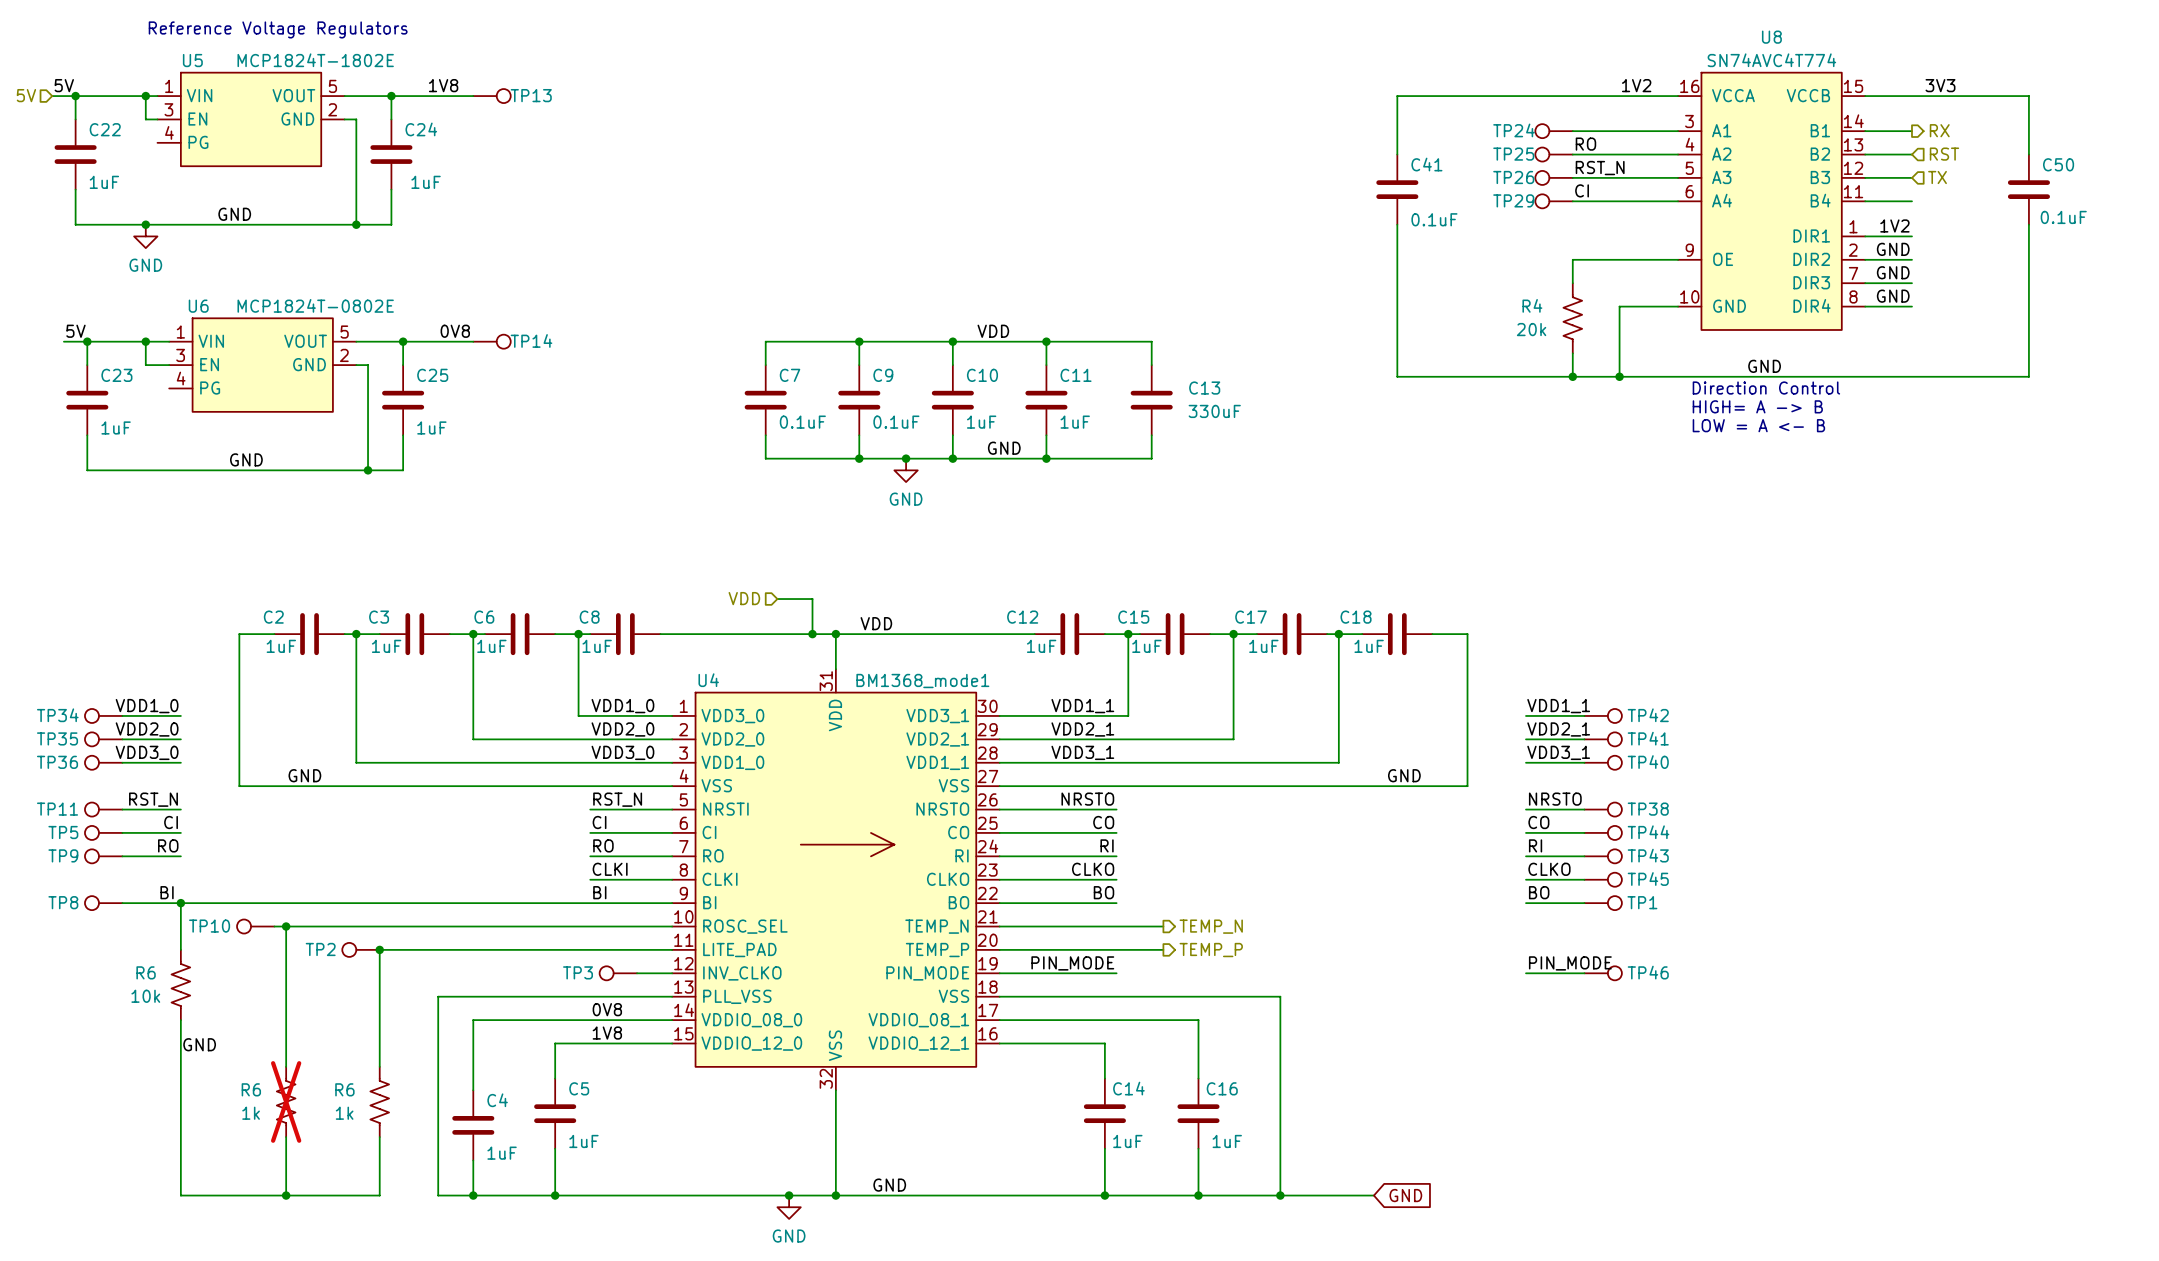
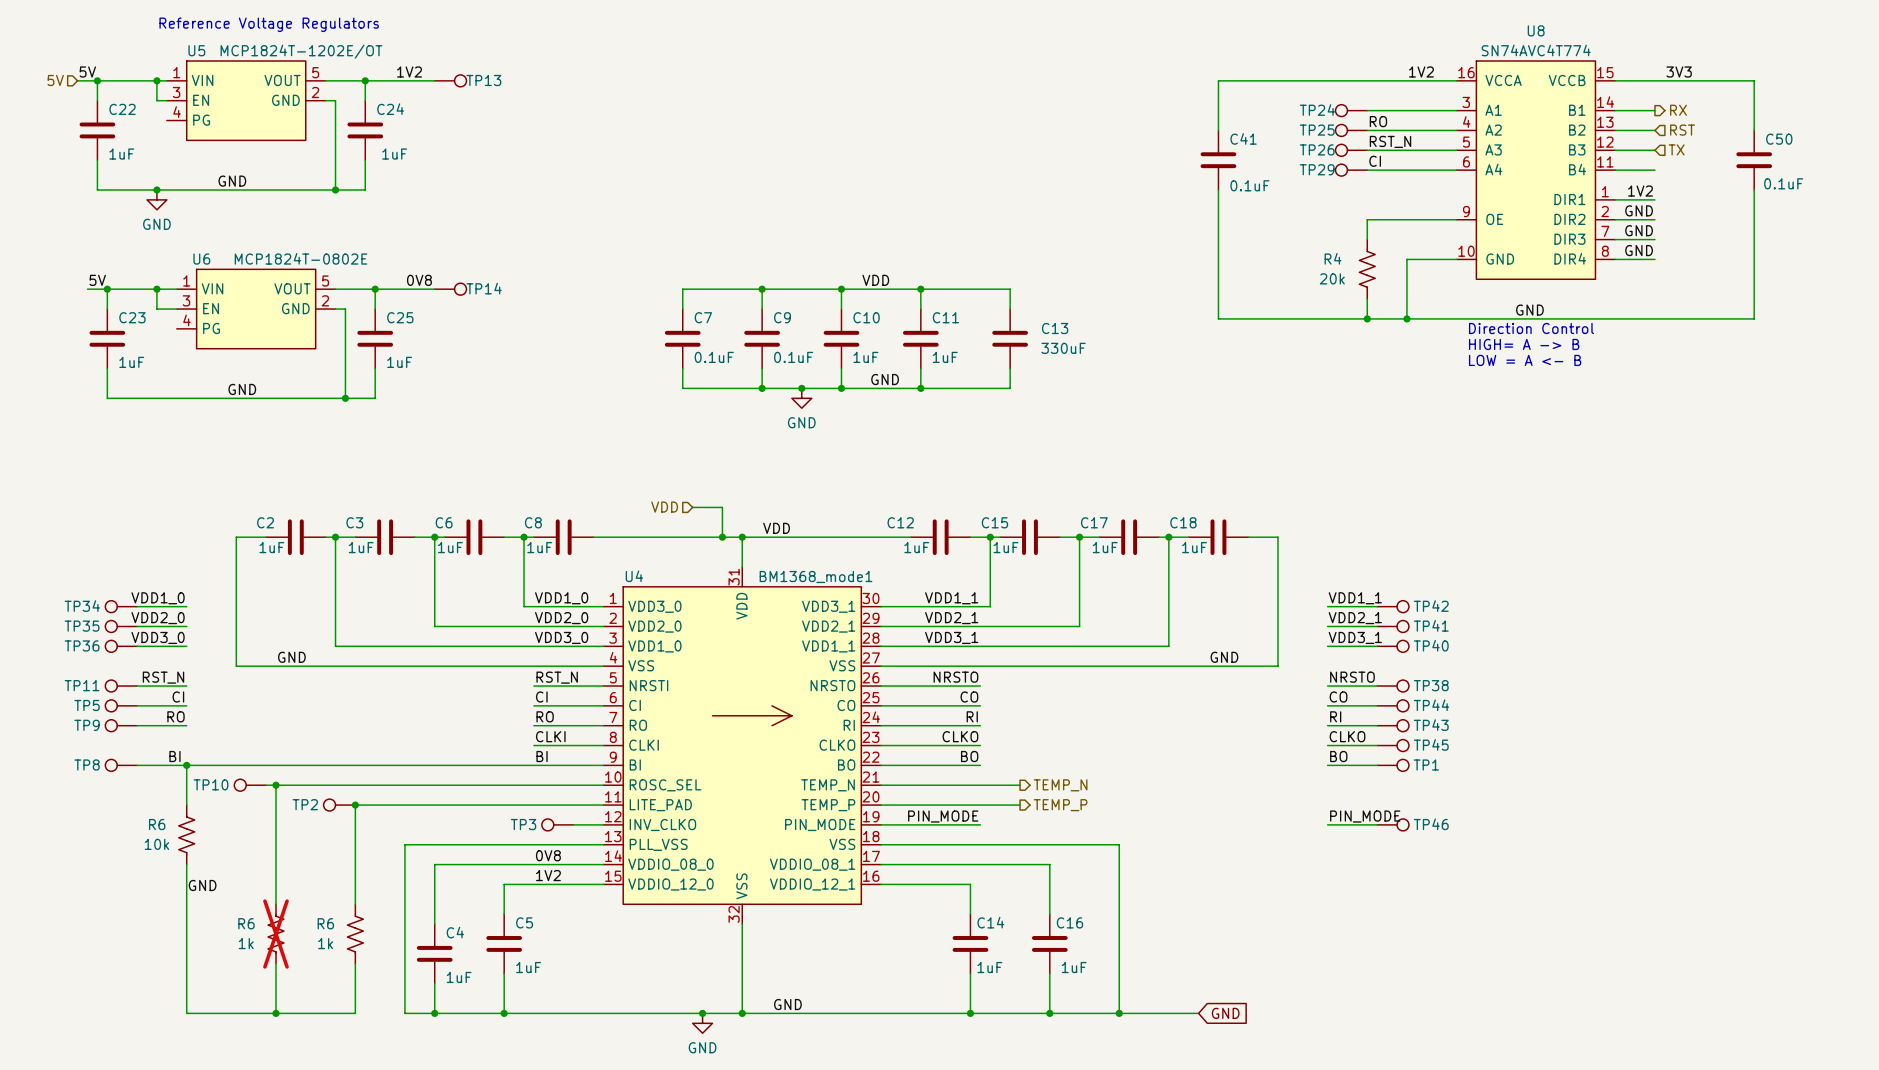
U5 value: MCP1824T-1802E (315, 60) -> MCP1824T-1202E/OT (301, 51)
label: 1V8 (443, 85) -> 1V2 (409, 72)
label: 1V8 (607, 1033) -> 1V2 (548, 875)

